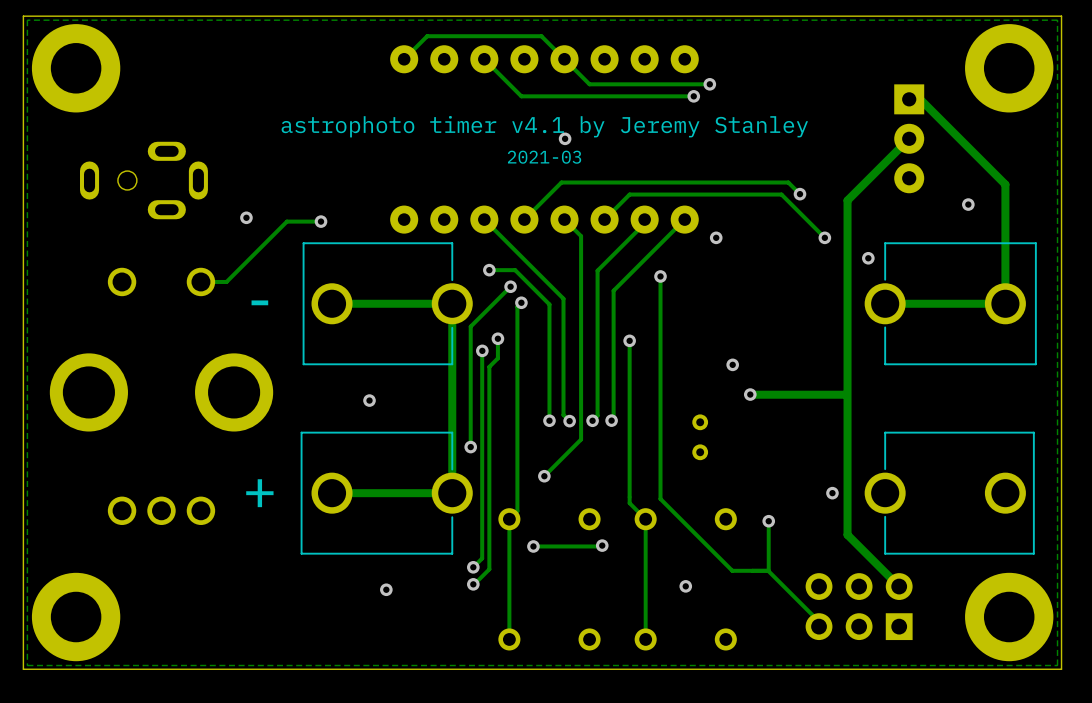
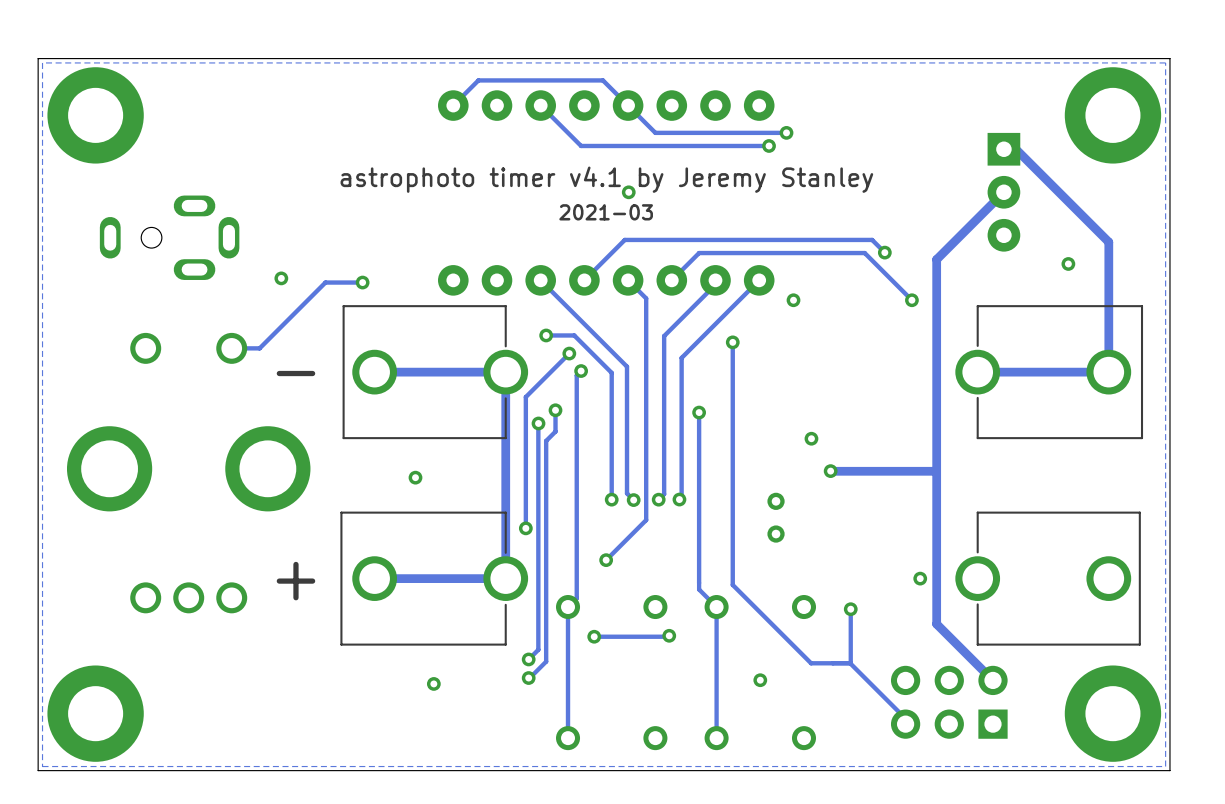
via: (868, 258) -> none

